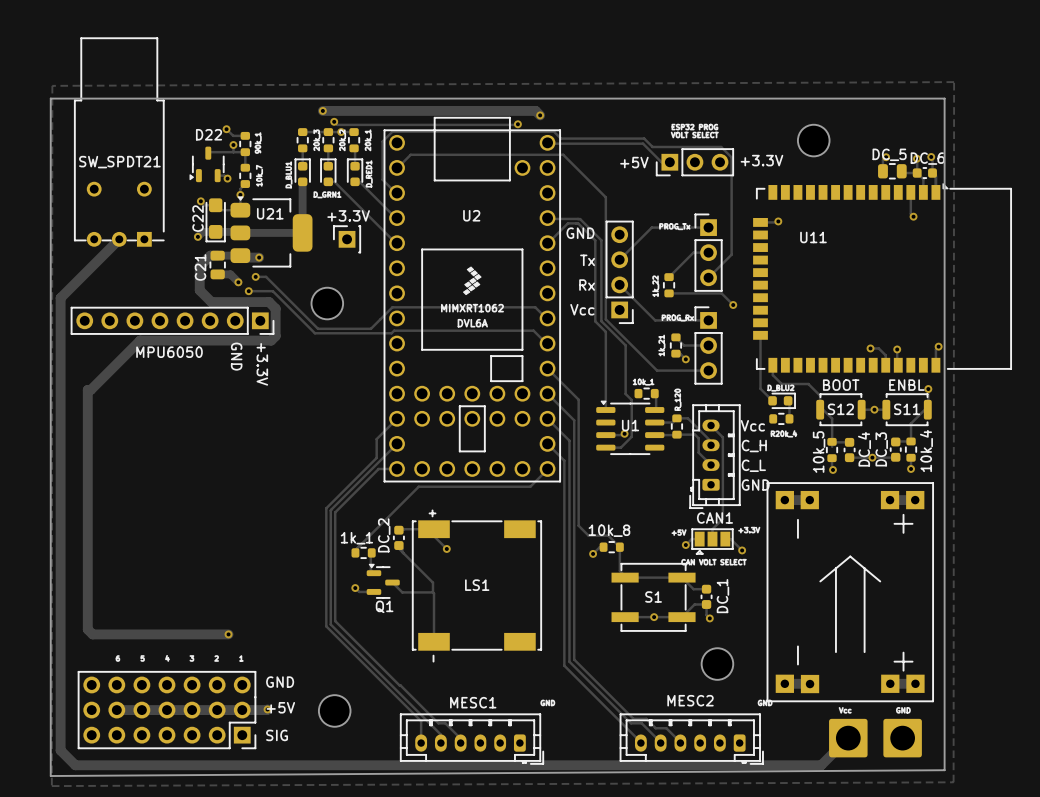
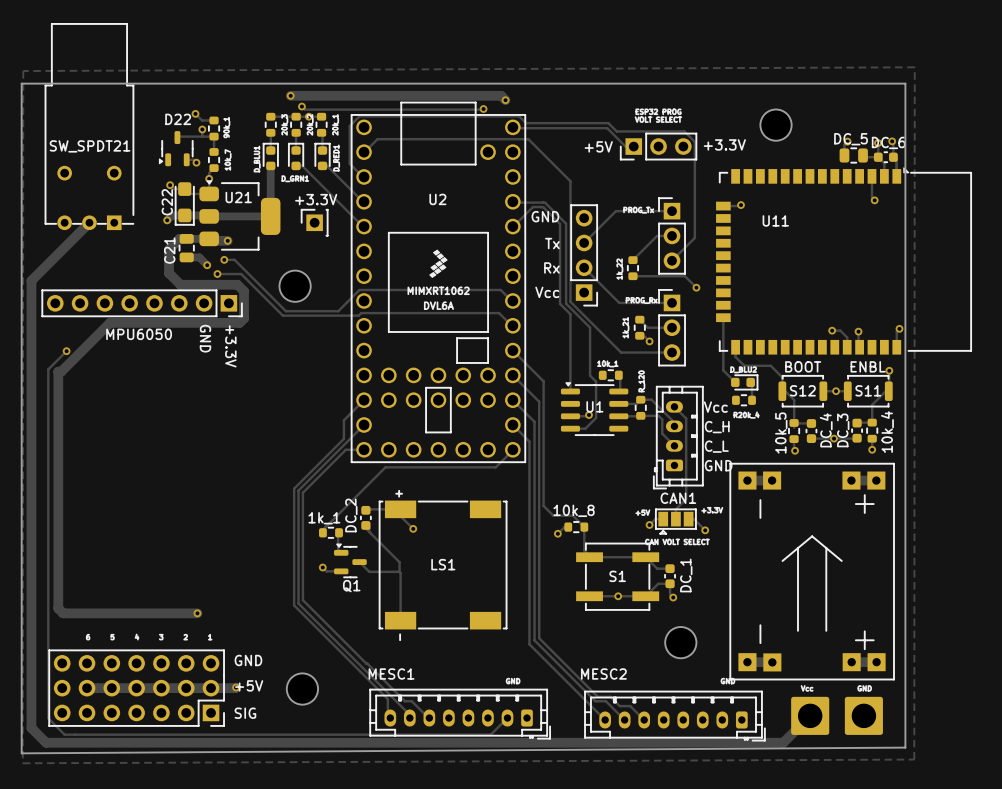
track: none -> (66, 351) (48, 369) (48, 718) (64, 734) (490, 734) (507, 718)
via: none -> (66, 351)
MESC2 name position: MESC2 (690, 700) -> MESC2 (603, 674)
MESC1 name position: MESC1 (473, 702) -> MESC1 (391, 674)
MESC1 footprint: [400, 713, 544, 765] -> [369, 689, 551, 740]
MESC2 footprint: [619, 713, 764, 765] -> [584, 690, 766, 742]

